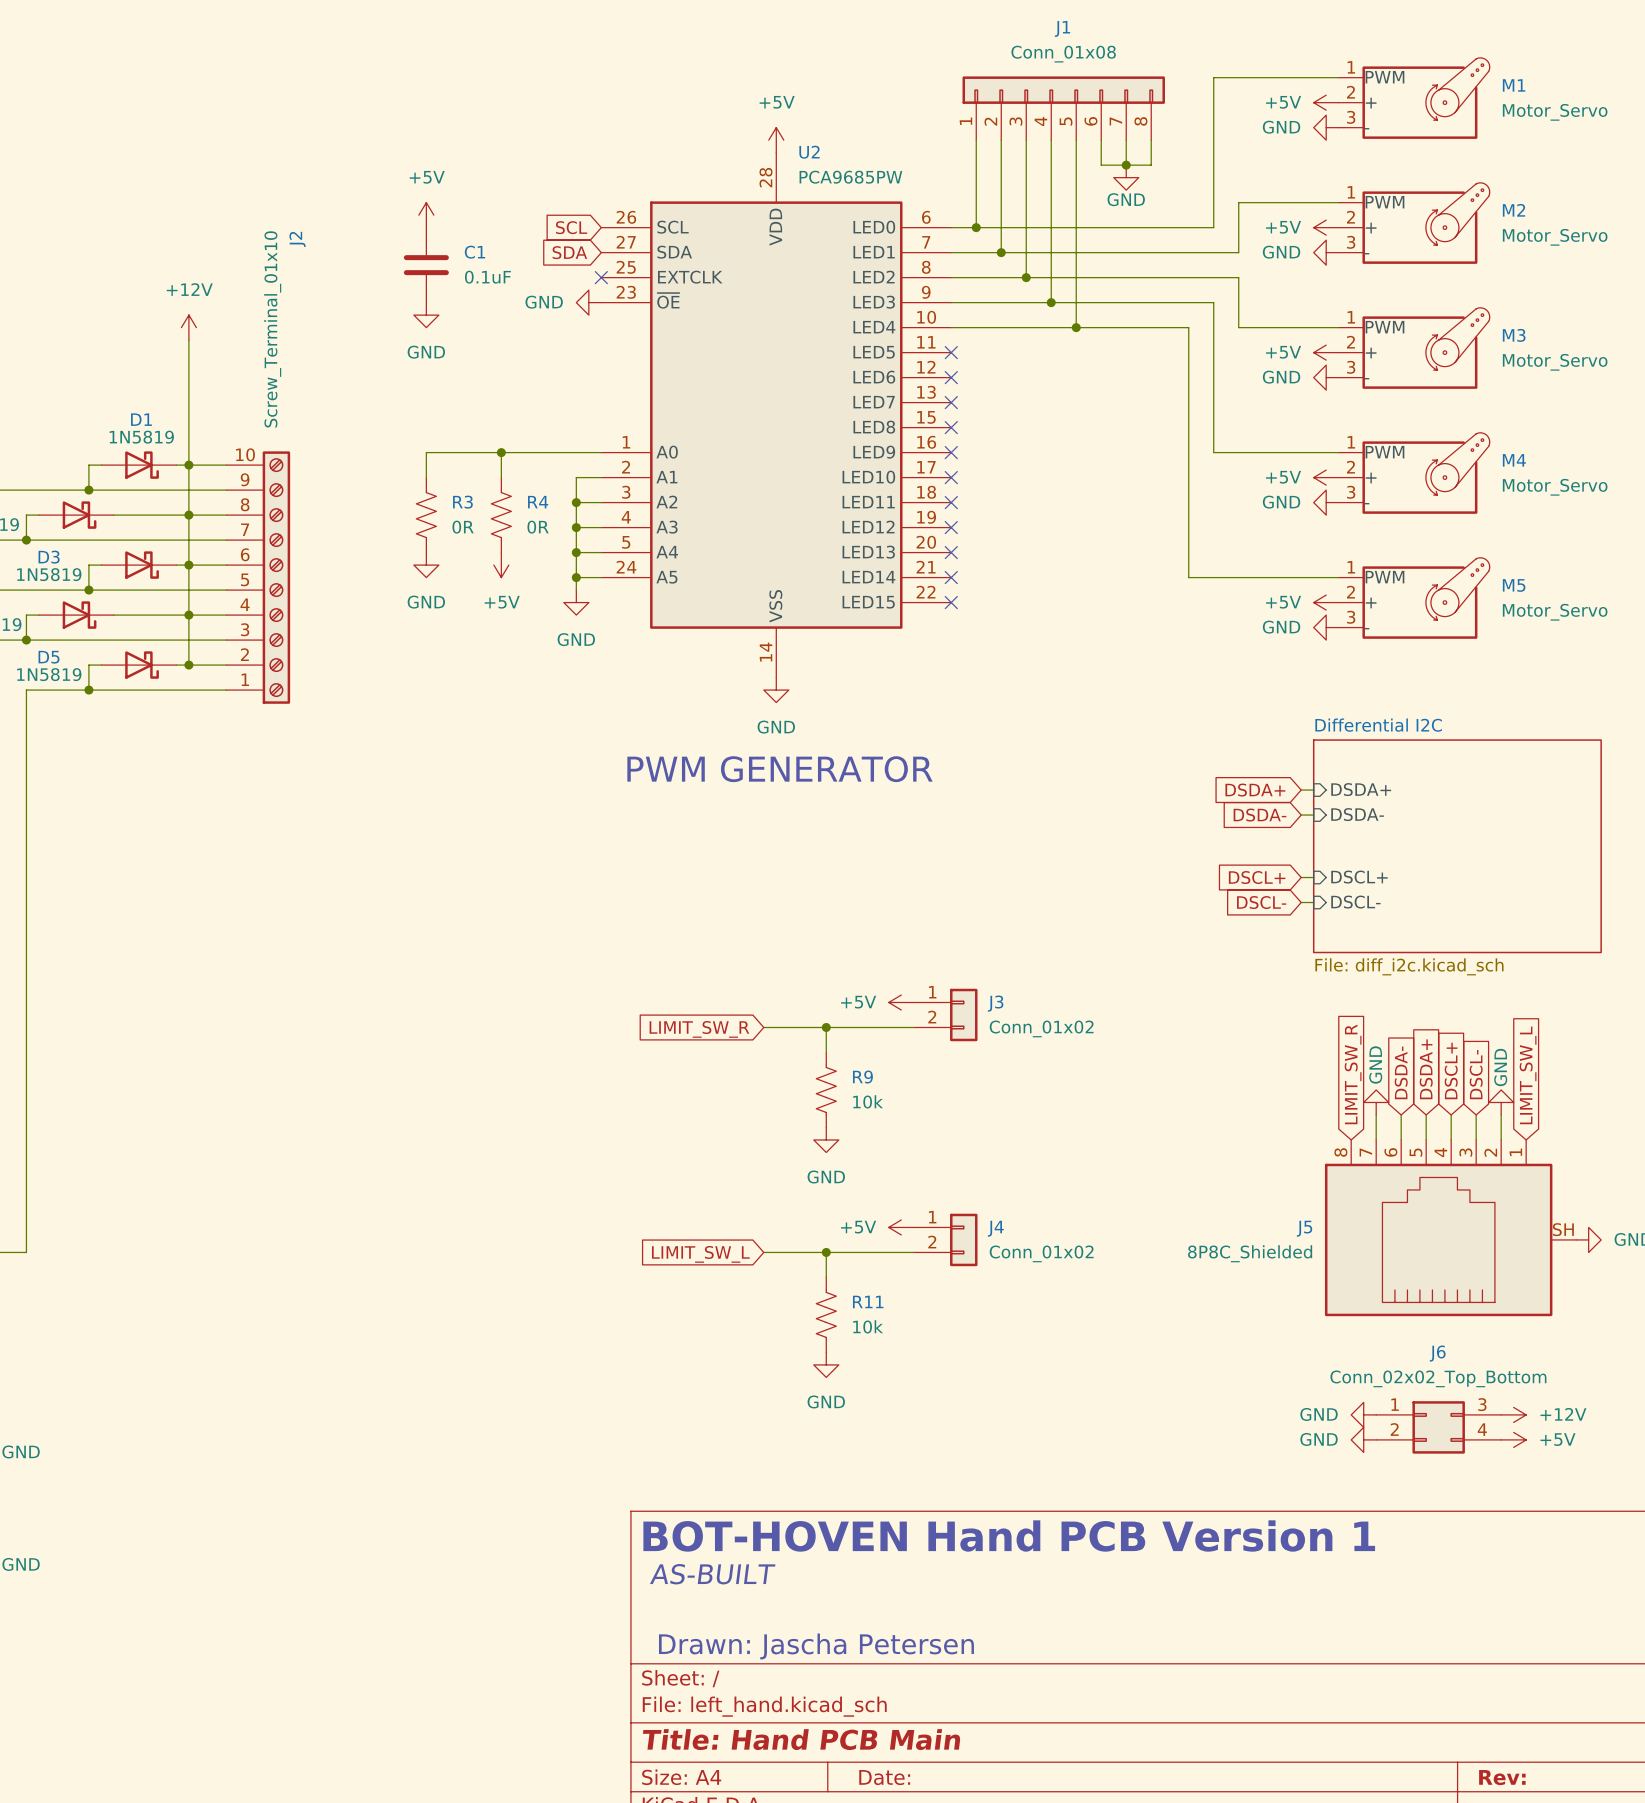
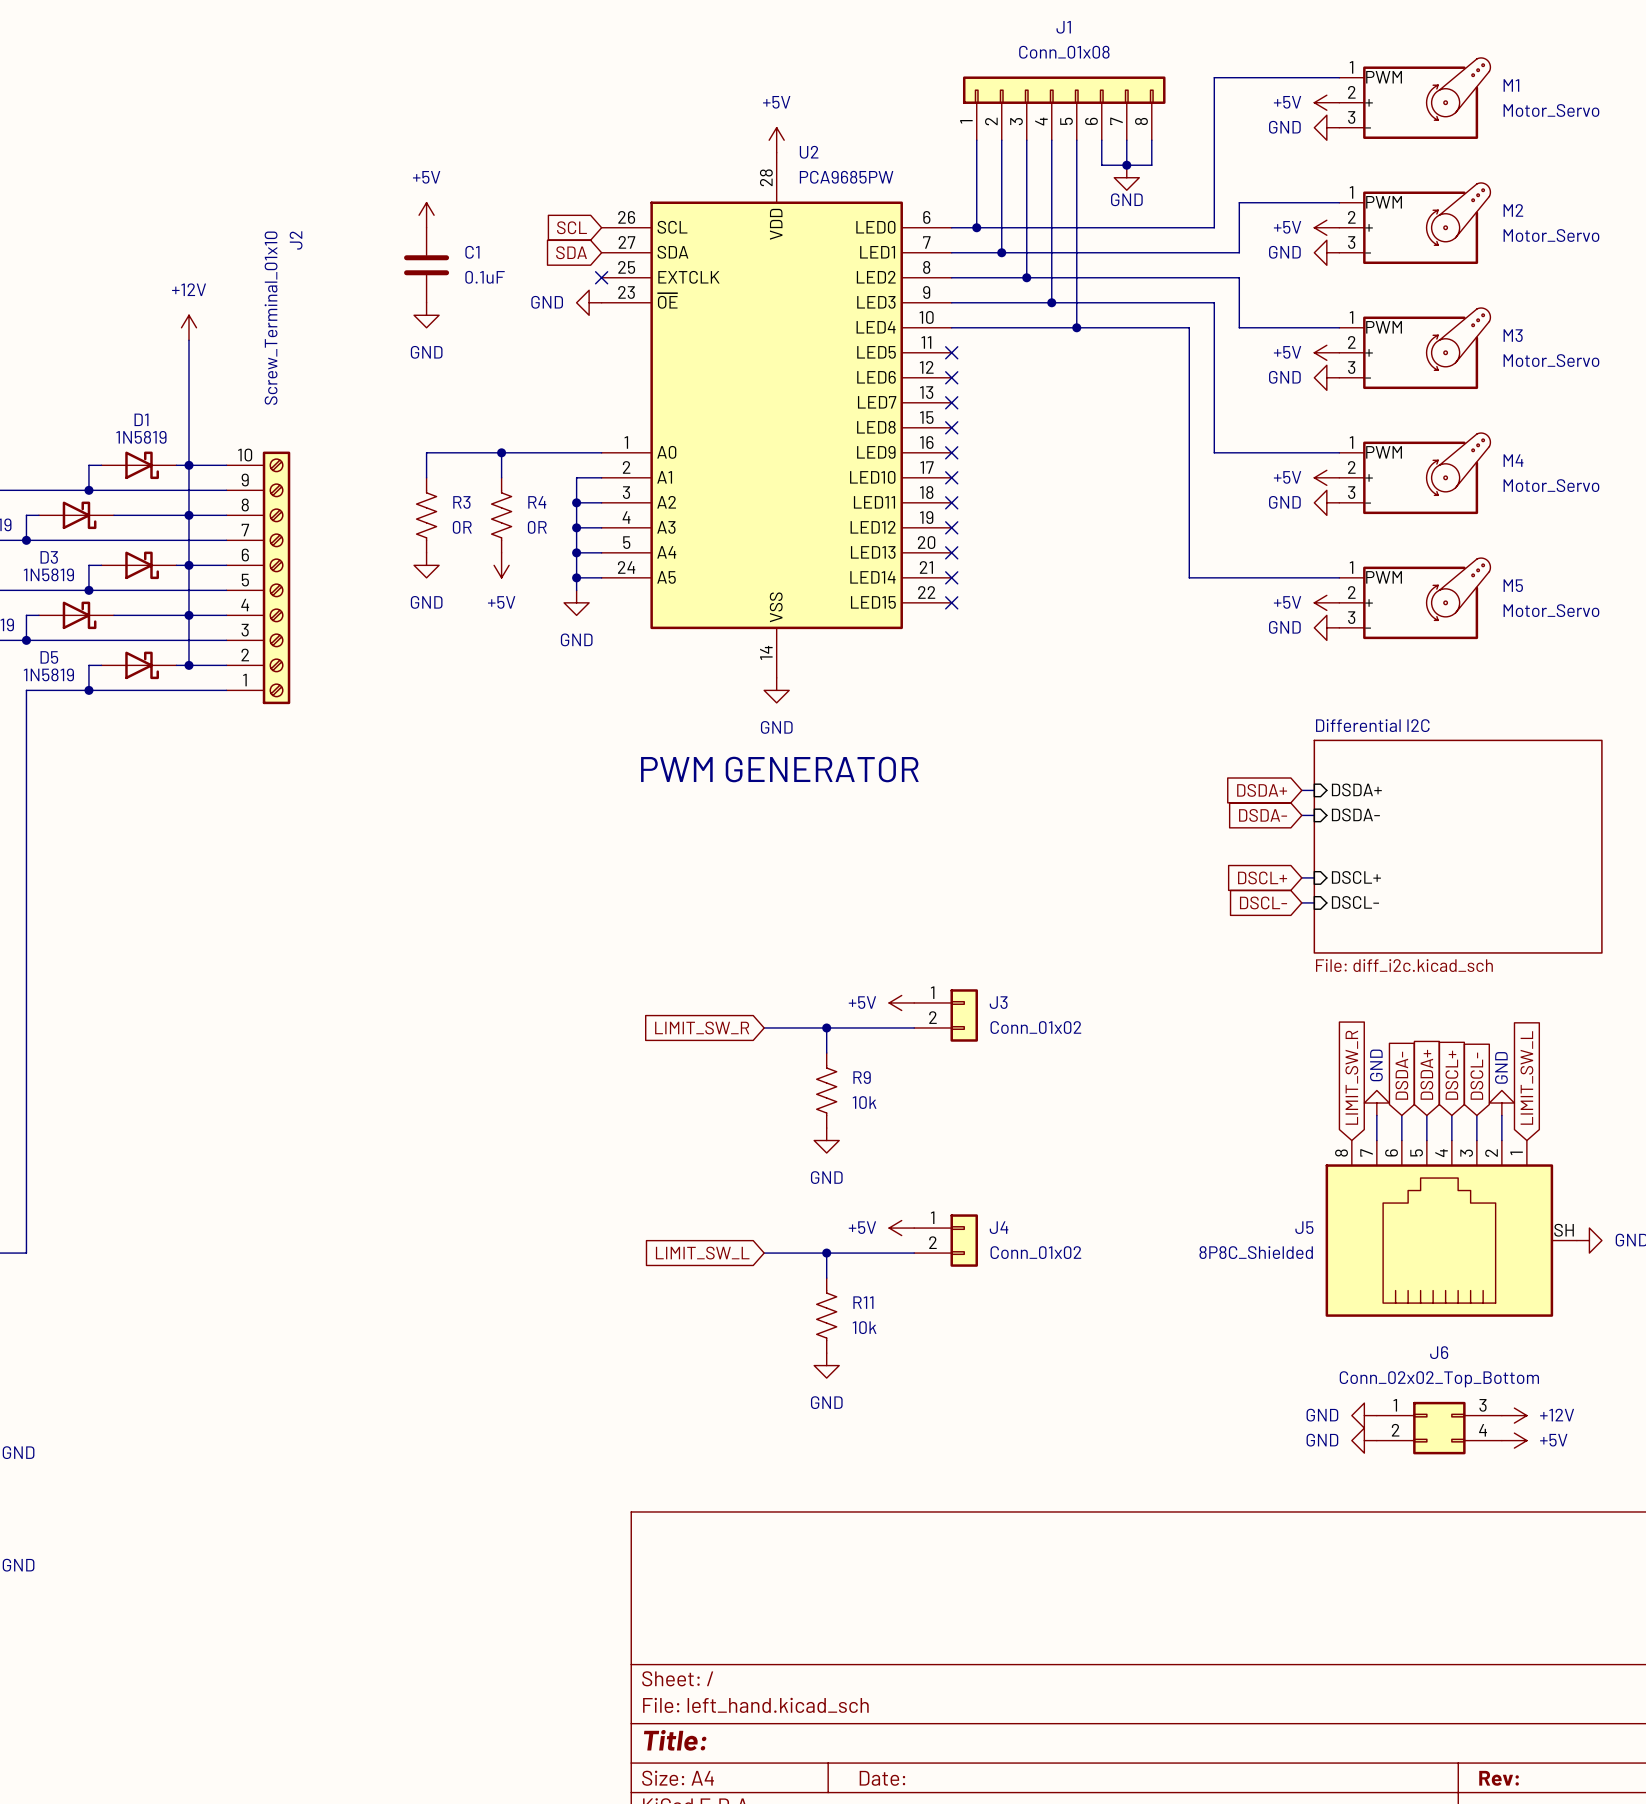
text: BOT-HOVEN Hand PCB Version 1 (1009, 1536) -> none
text: AS-BUILT (712, 1574) -> none
text: Drawn: Jascha Petersen (816, 1646) -> none
title block: Title: Hand PCB Main (801, 1739) -> Title: (675, 1740)

